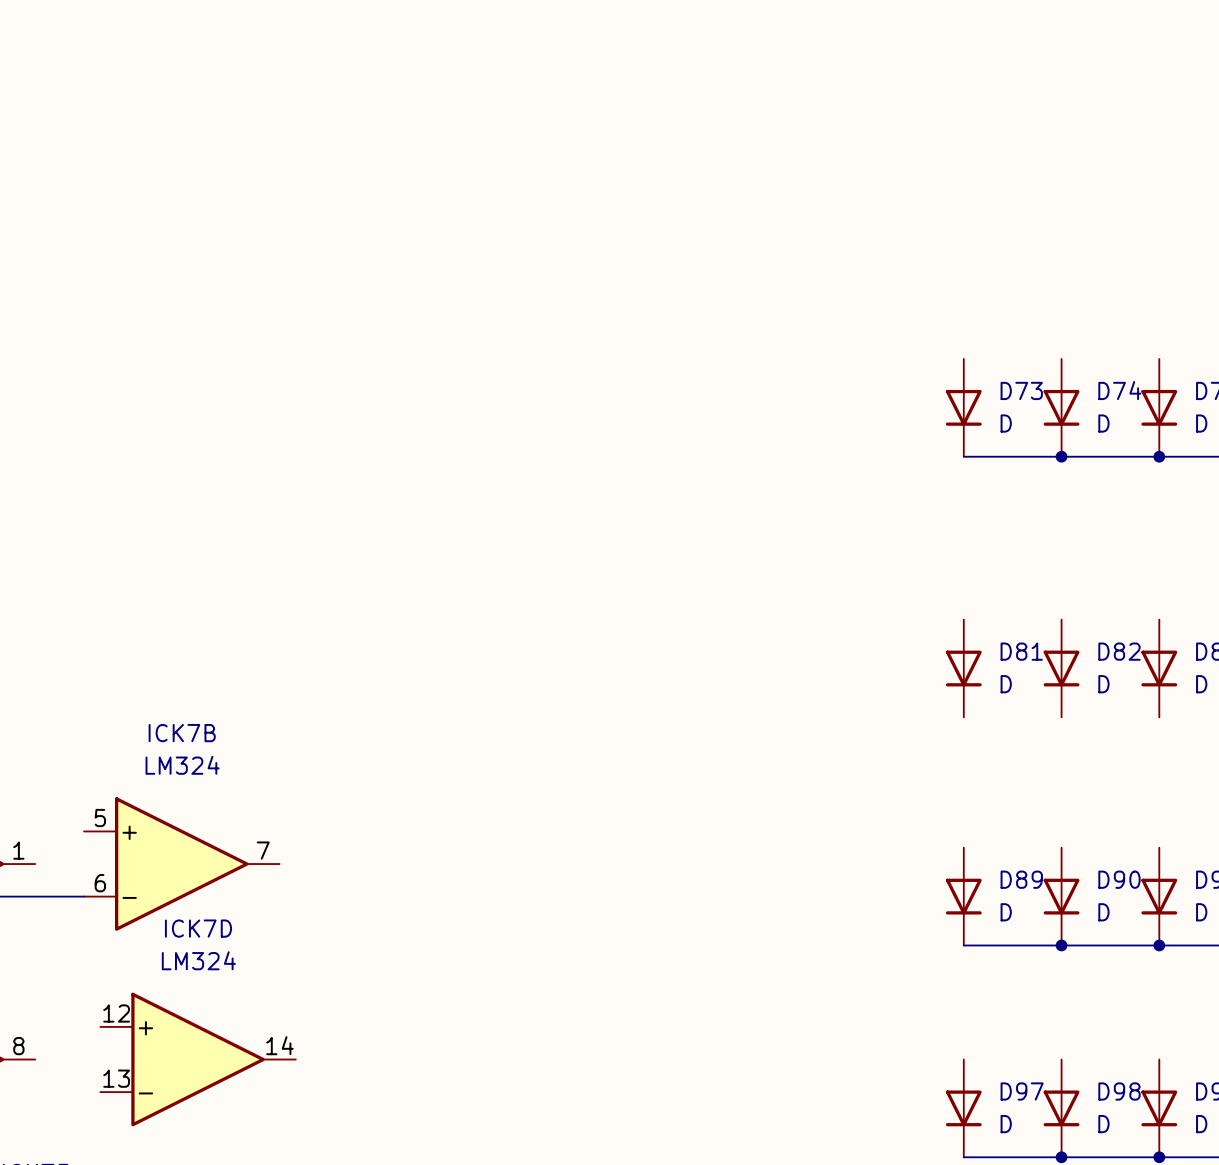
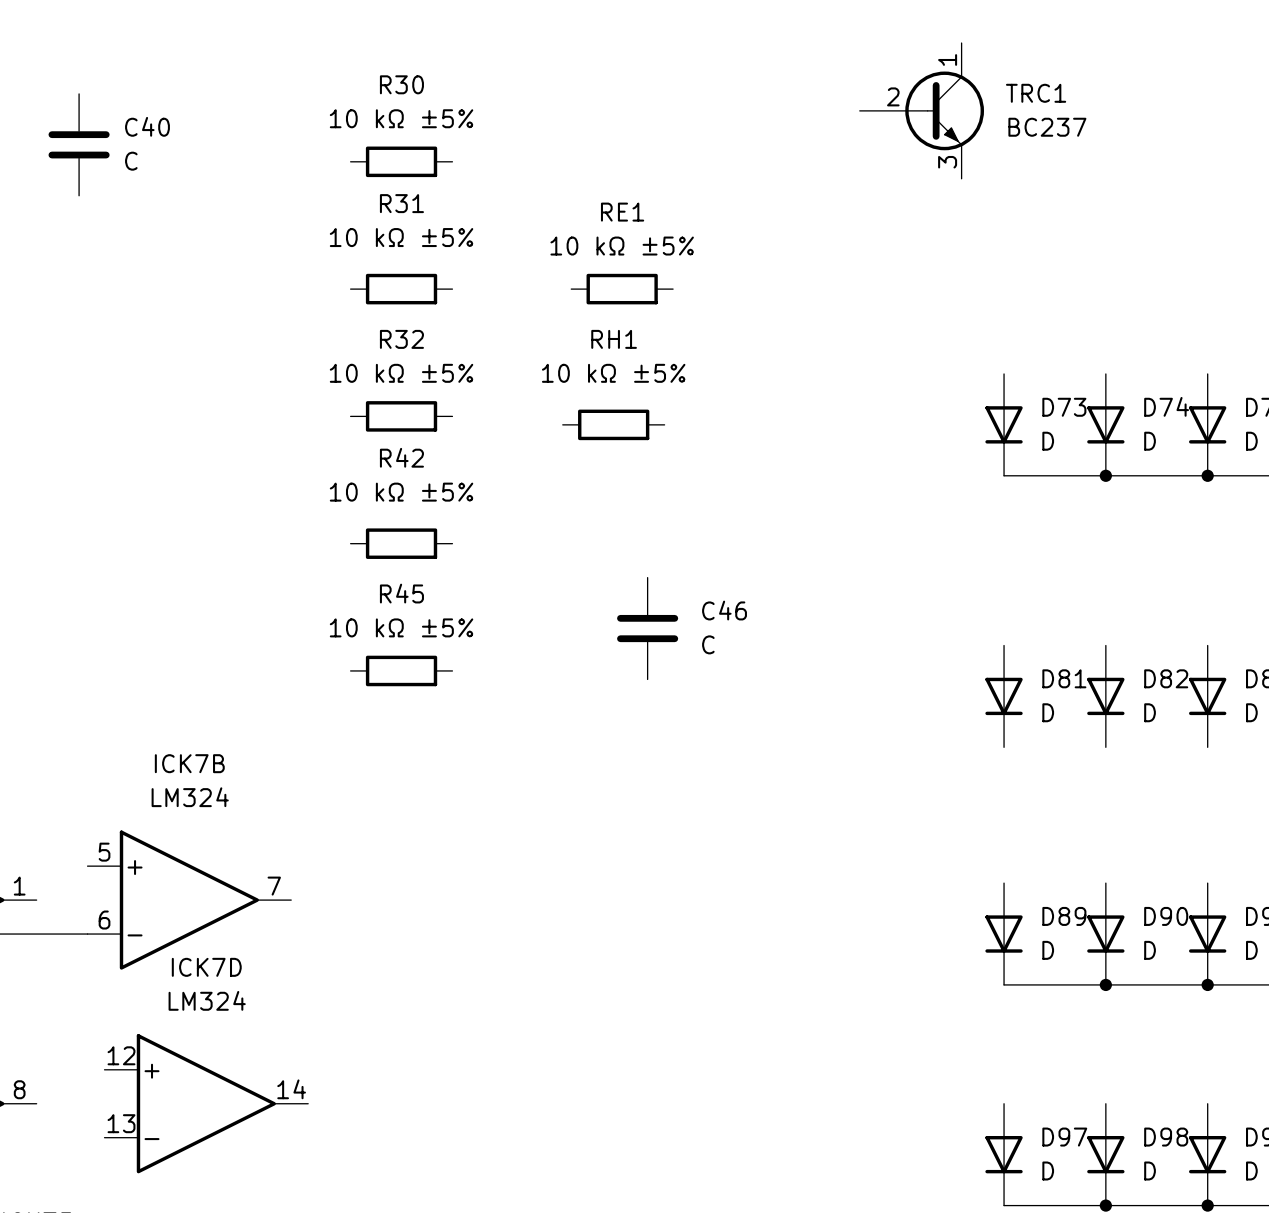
TRC1: none -> BC237 (921, 110)
C40: none -> C (79, 144)
R30: none -> 10 kΩ ±5% (401, 161)
R31: none -> 10 kΩ ±5% (401, 289)
RE1: none -> 10 kΩ ±5% (622, 289)
R32: none -> 10 kΩ ±5% (401, 416)
RH1: none -> 10 kΩ ±5% (613, 424)
R42: none -> 10 kΩ ±5% (401, 543)
C46: none -> C (647, 628)
R45: none -> 10 kΩ ±5% (401, 670)

